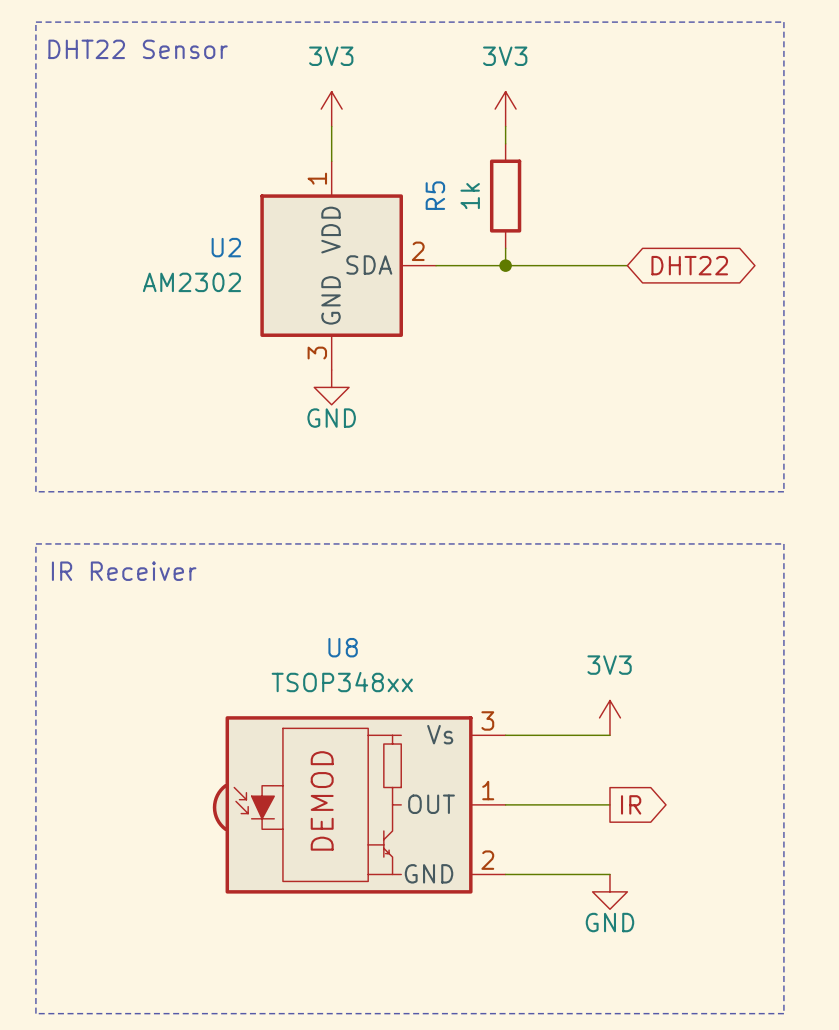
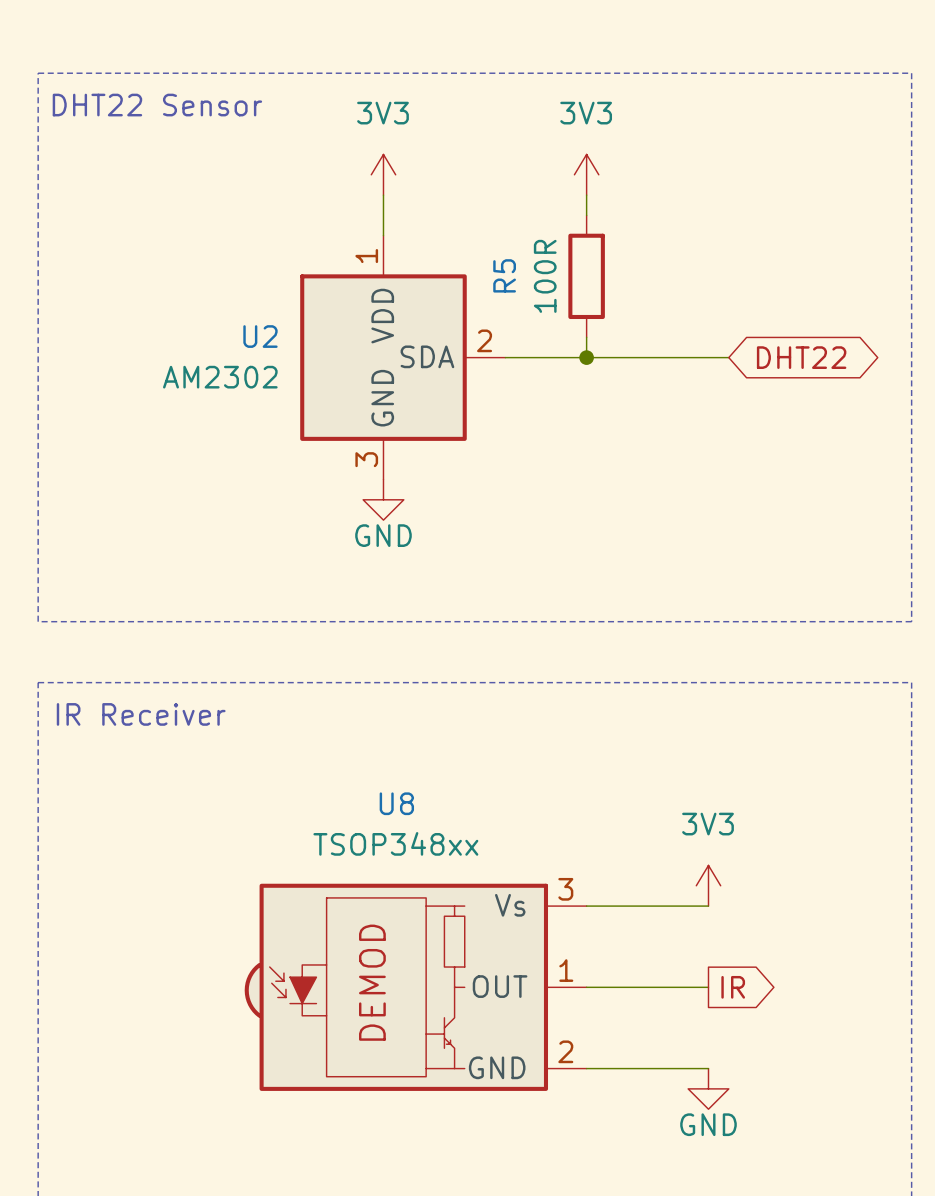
R5 value: 1k (470, 196) -> 100R (545, 276)

